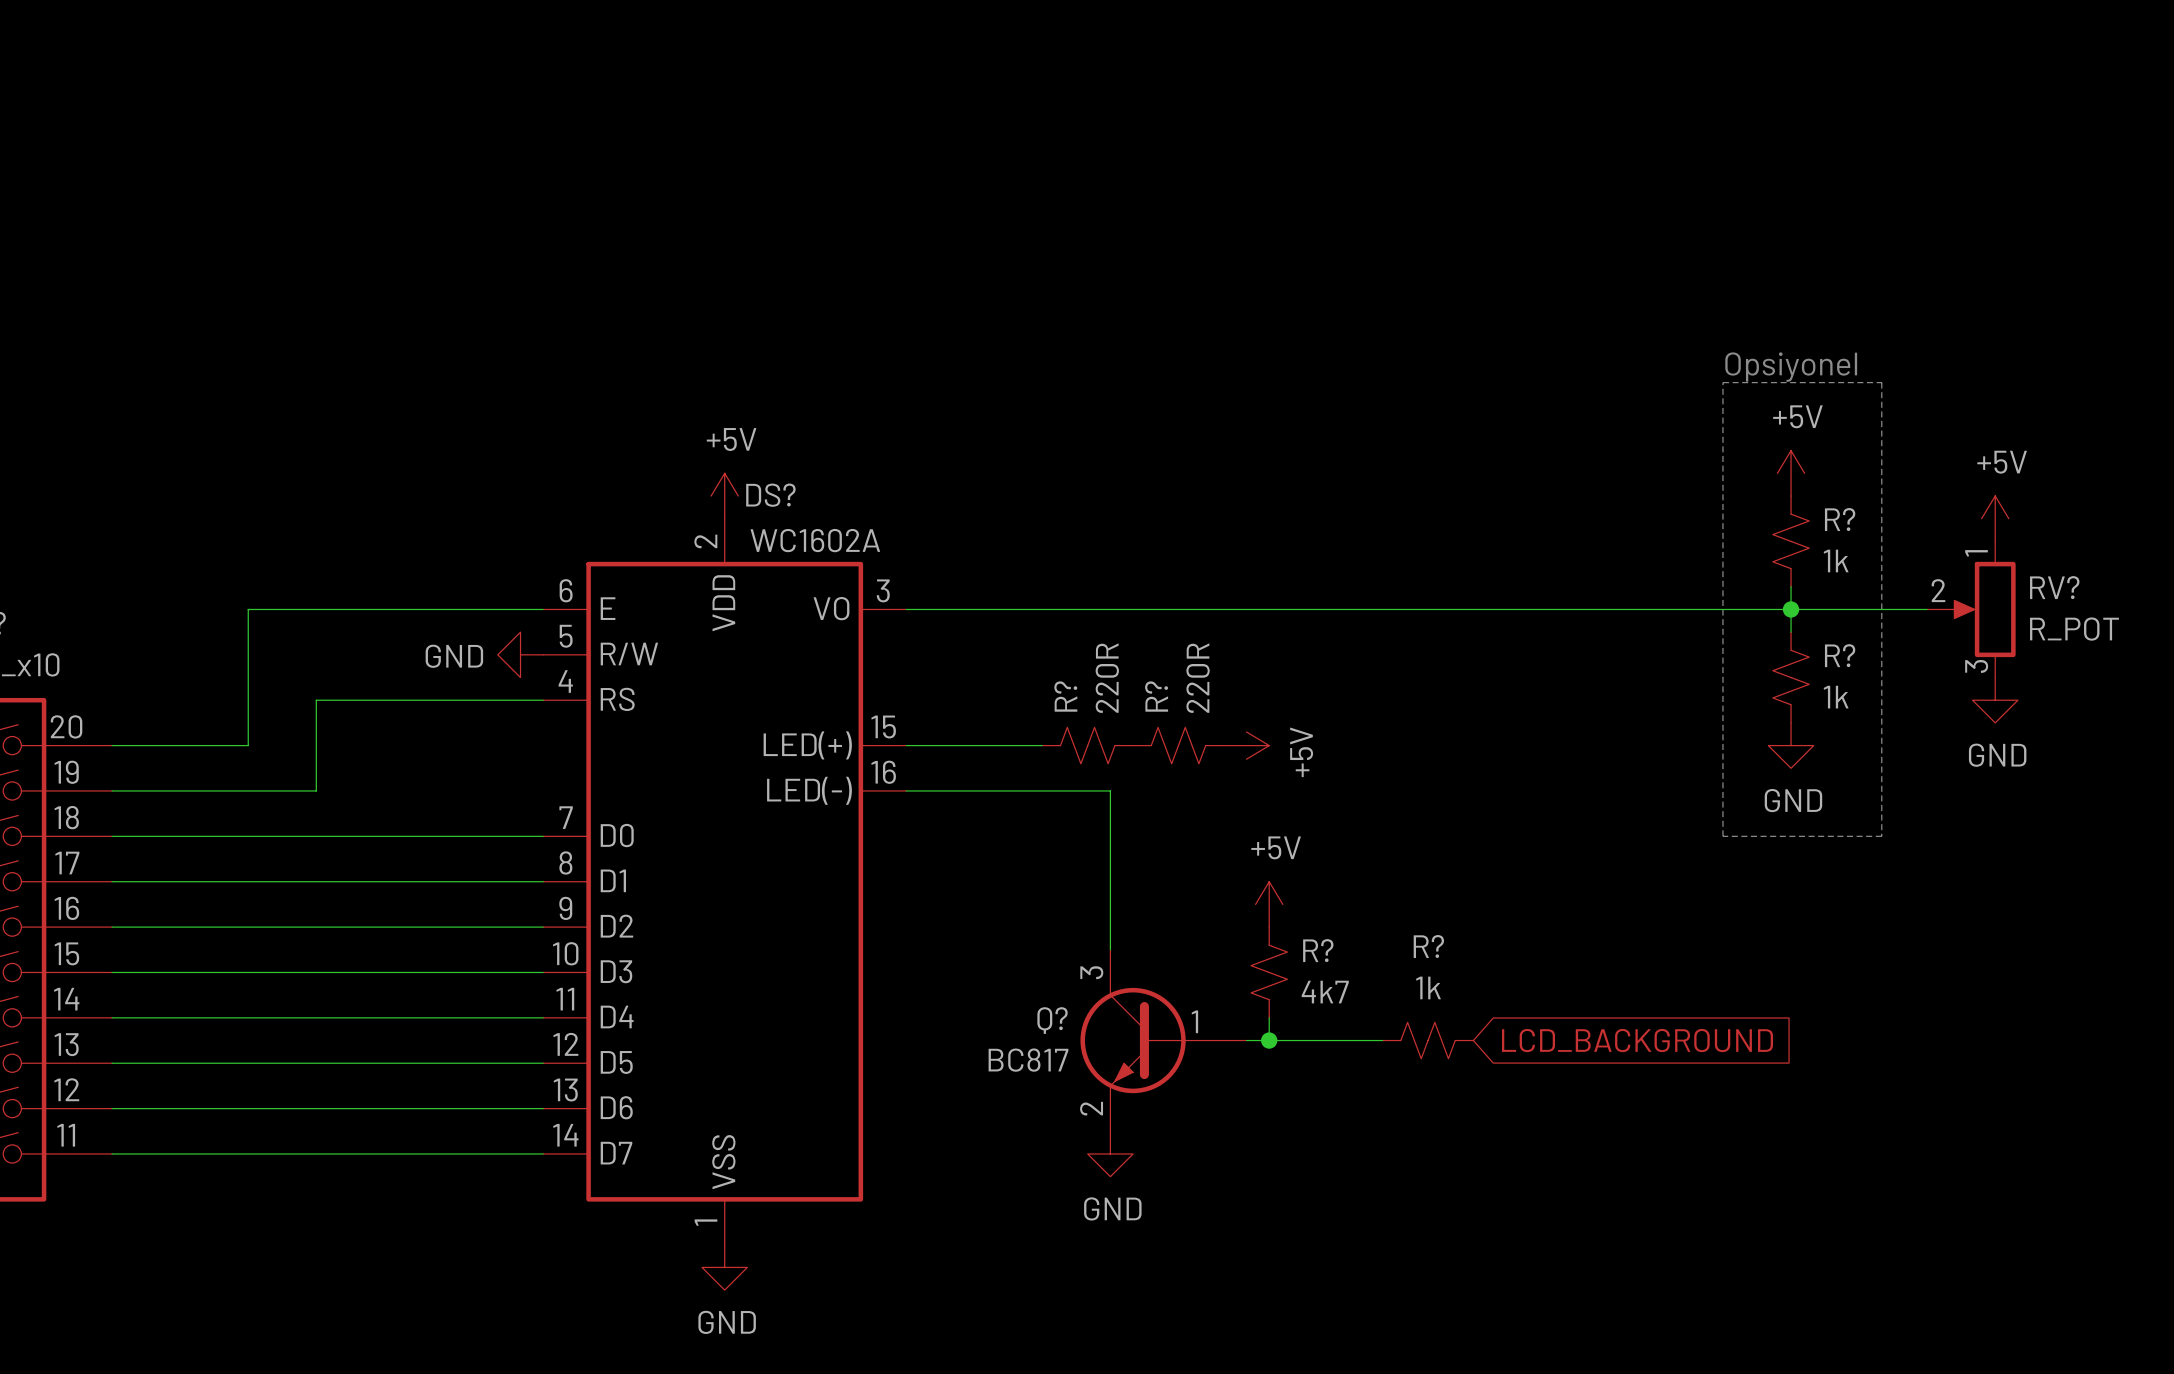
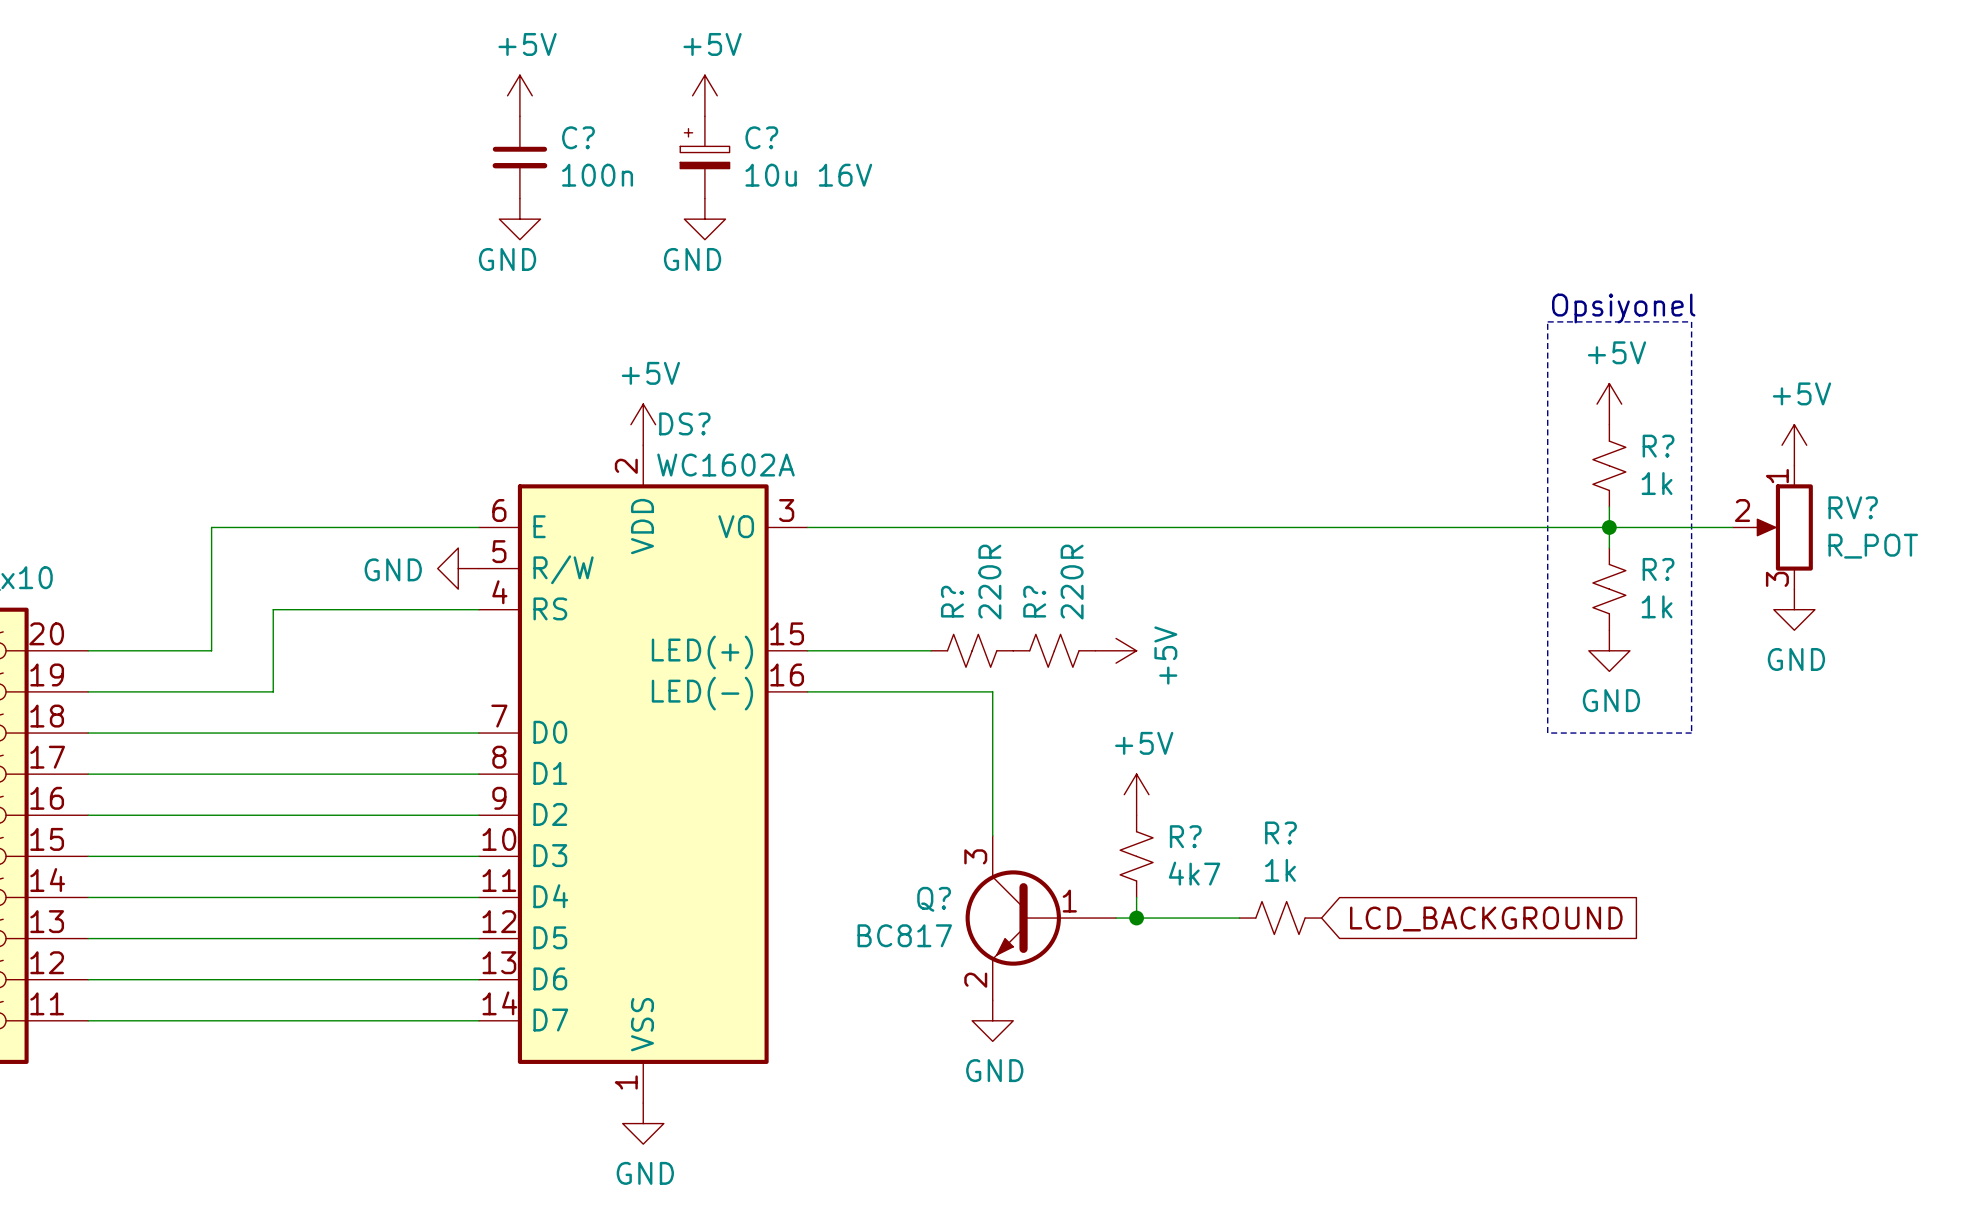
power symbol: none -> +5V (519, 95)
power symbol: none -> +5V (704, 95)
C?: none -> 100n (519, 157)
C?: none -> 10u 16V (704, 157)
power symbol: none -> GND (519, 219)
power symbol: none -> GND (704, 219)

